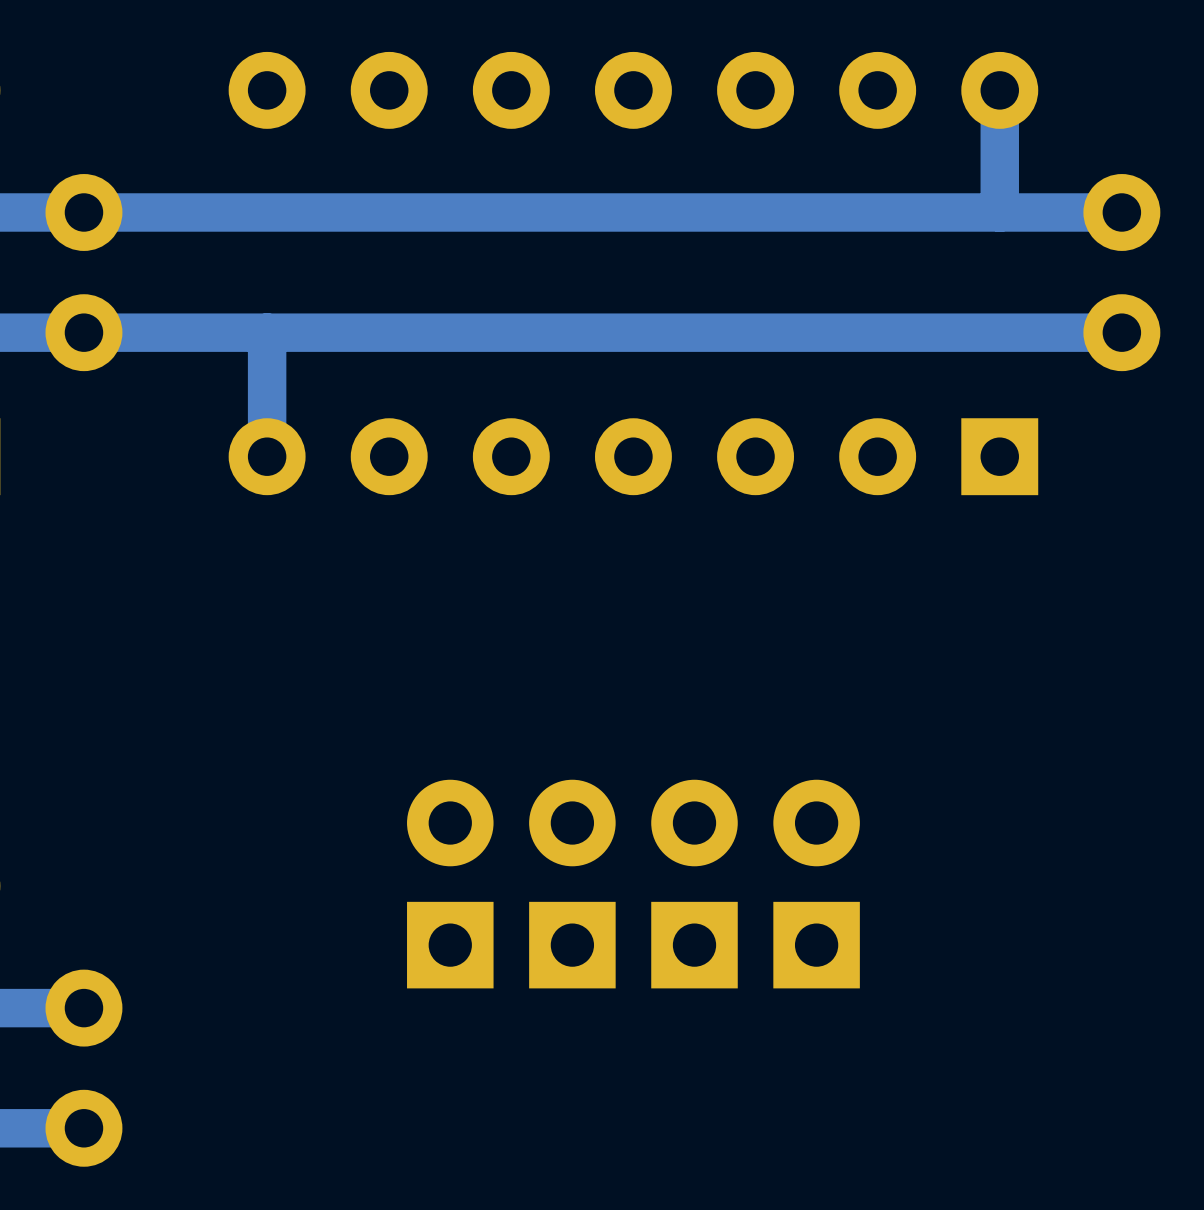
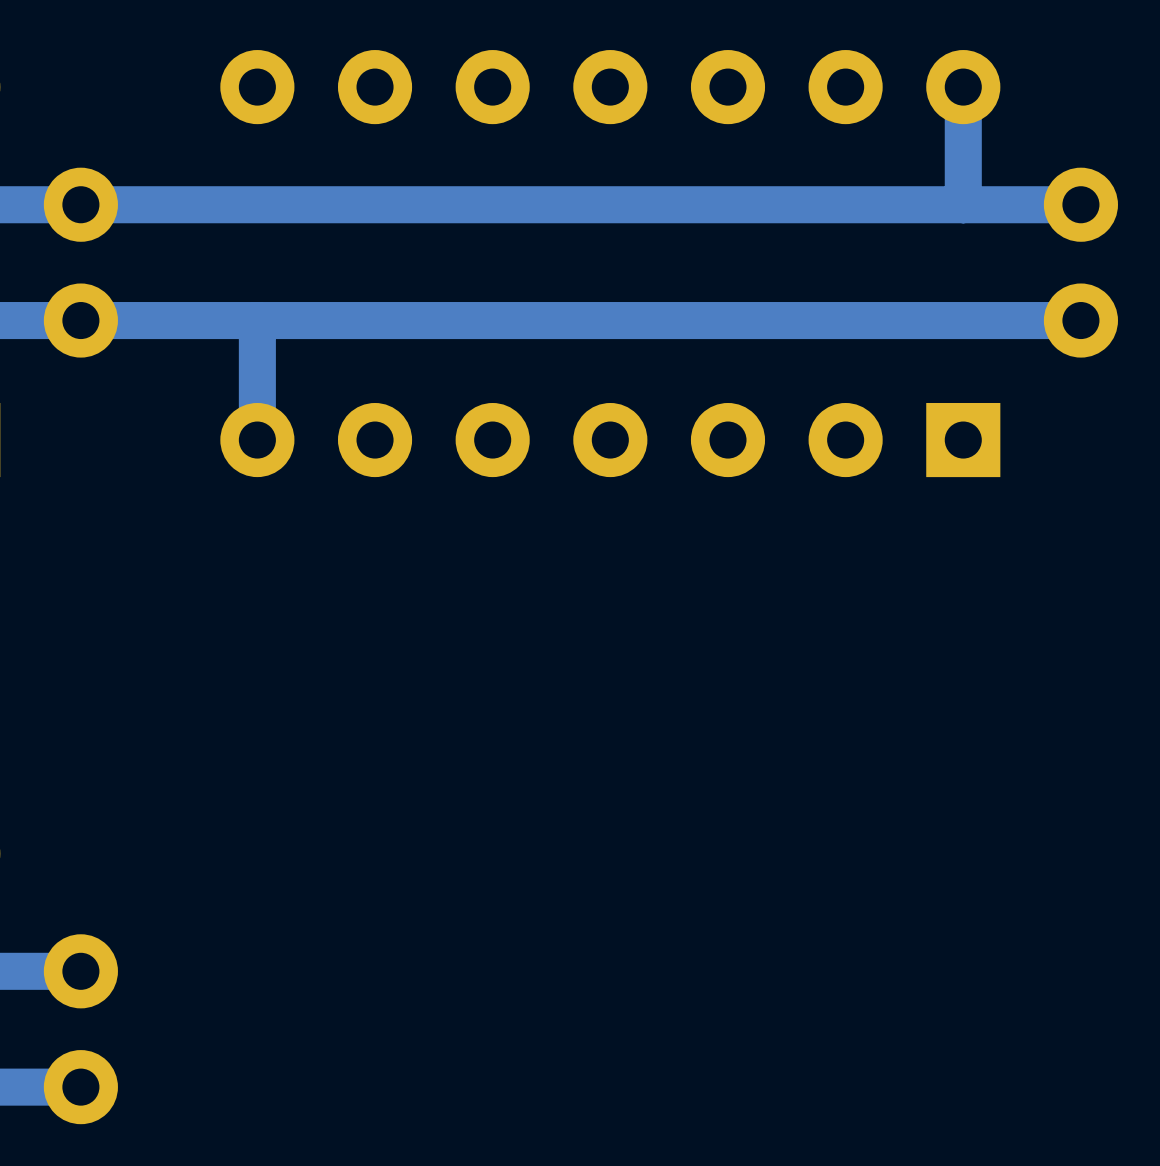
part: (450, 884) -> none
part: (572, 884) -> none
part: (694, 884) -> none
part: (816, 884) -> none

